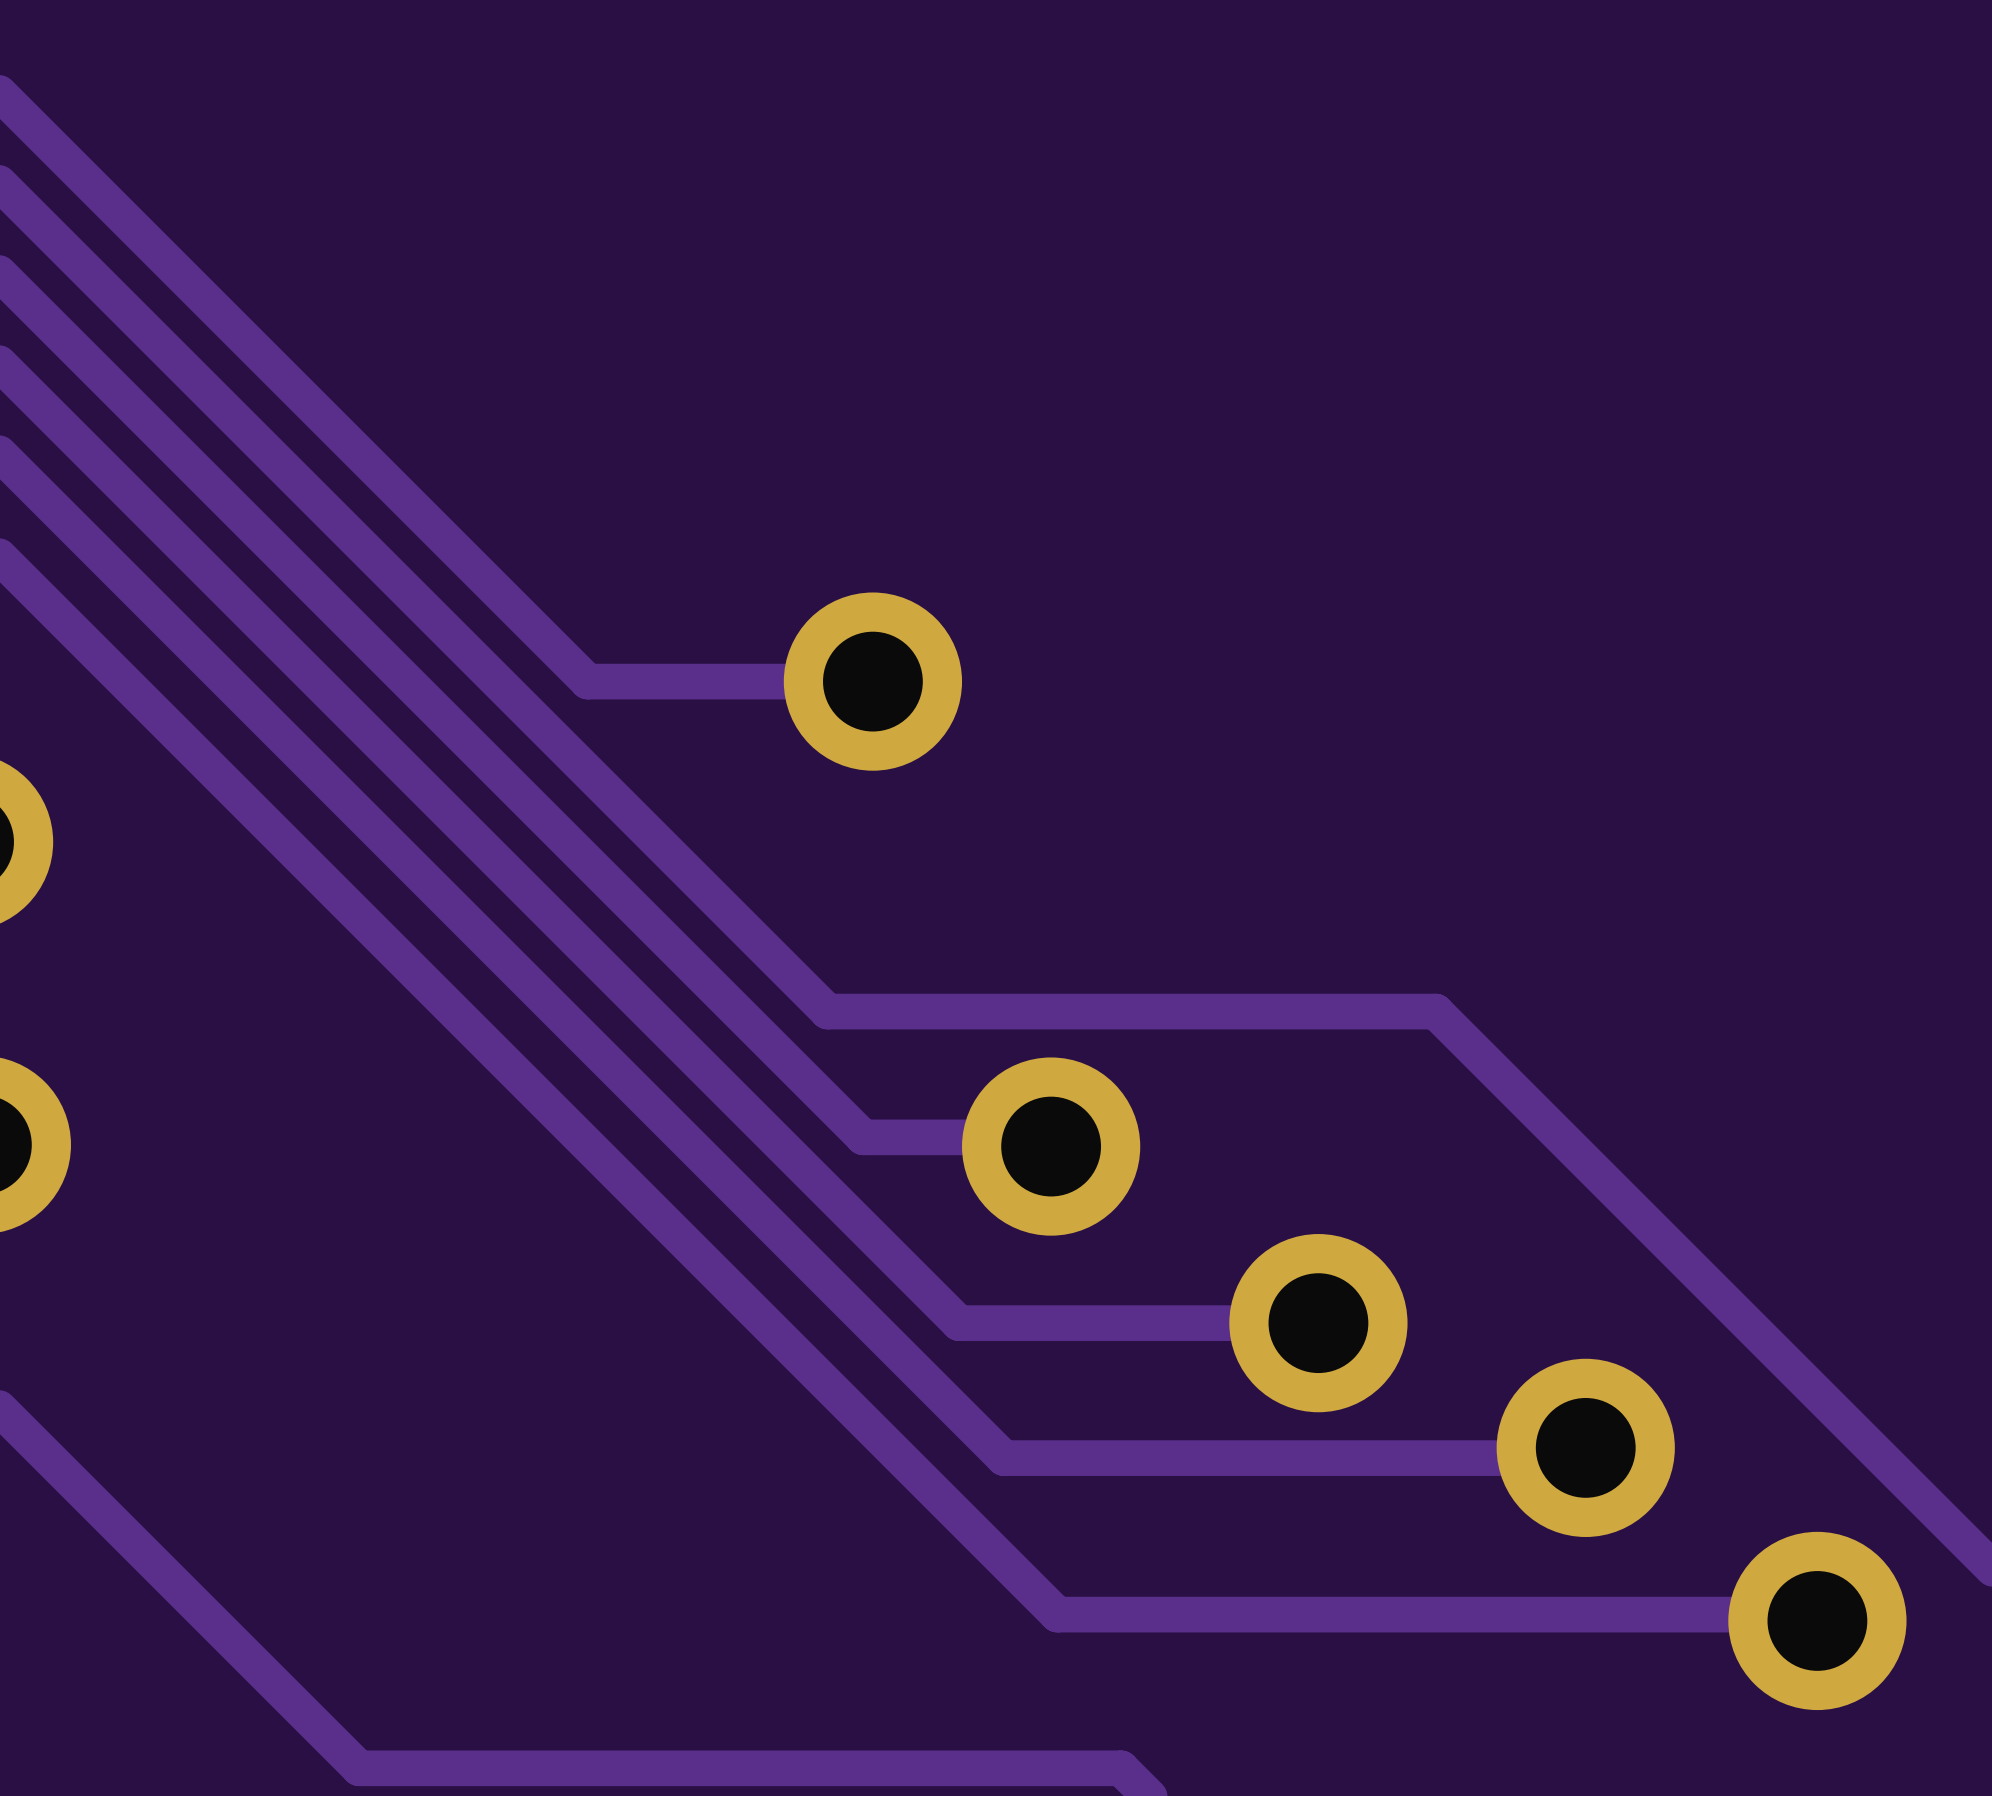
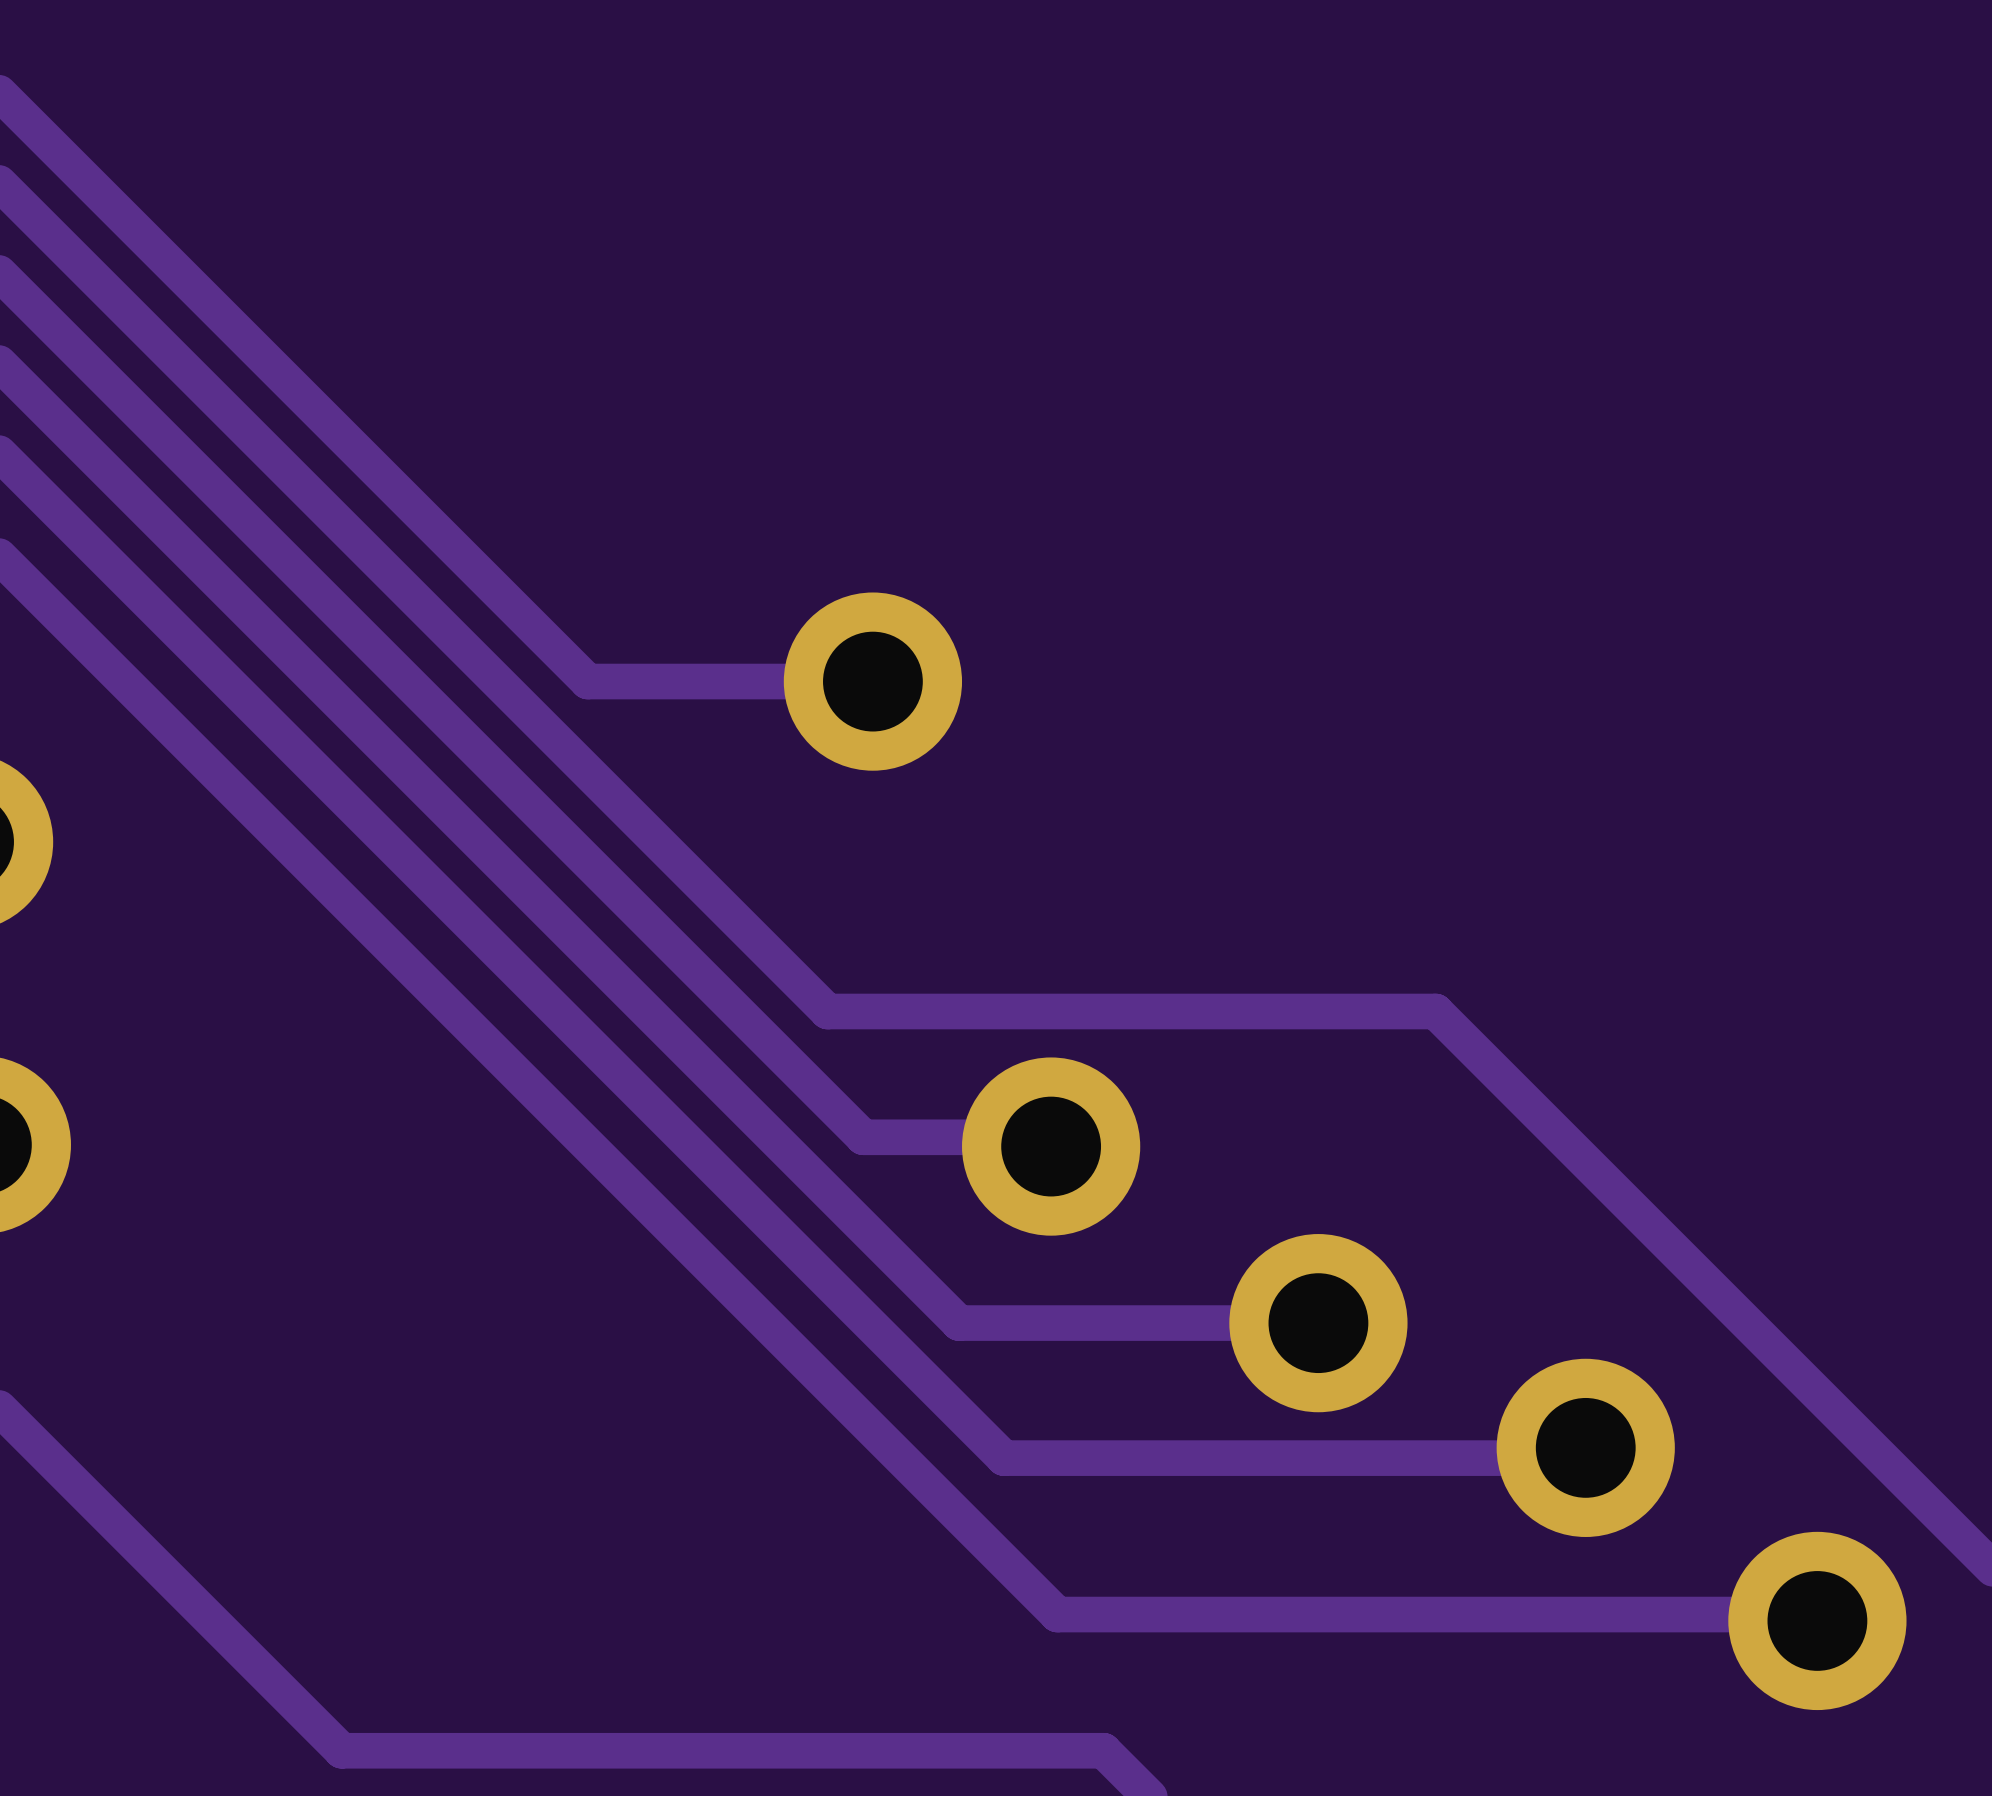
track: (341, 1750) (359, 1768) (1121, 1768) -> (341, 1750) (1103, 1750) (1121, 1768)

